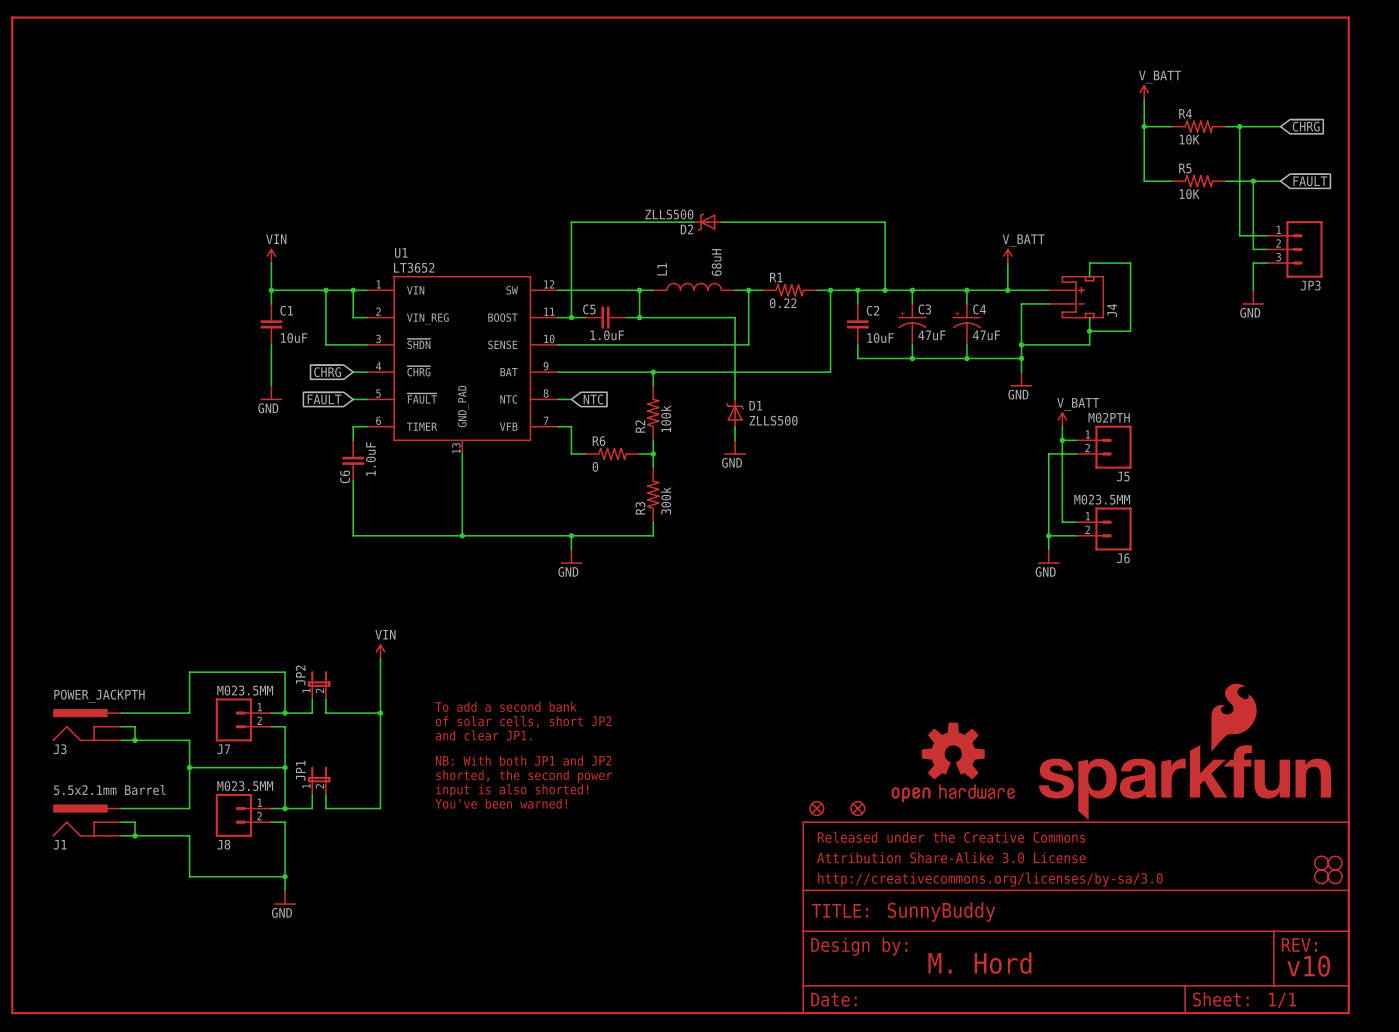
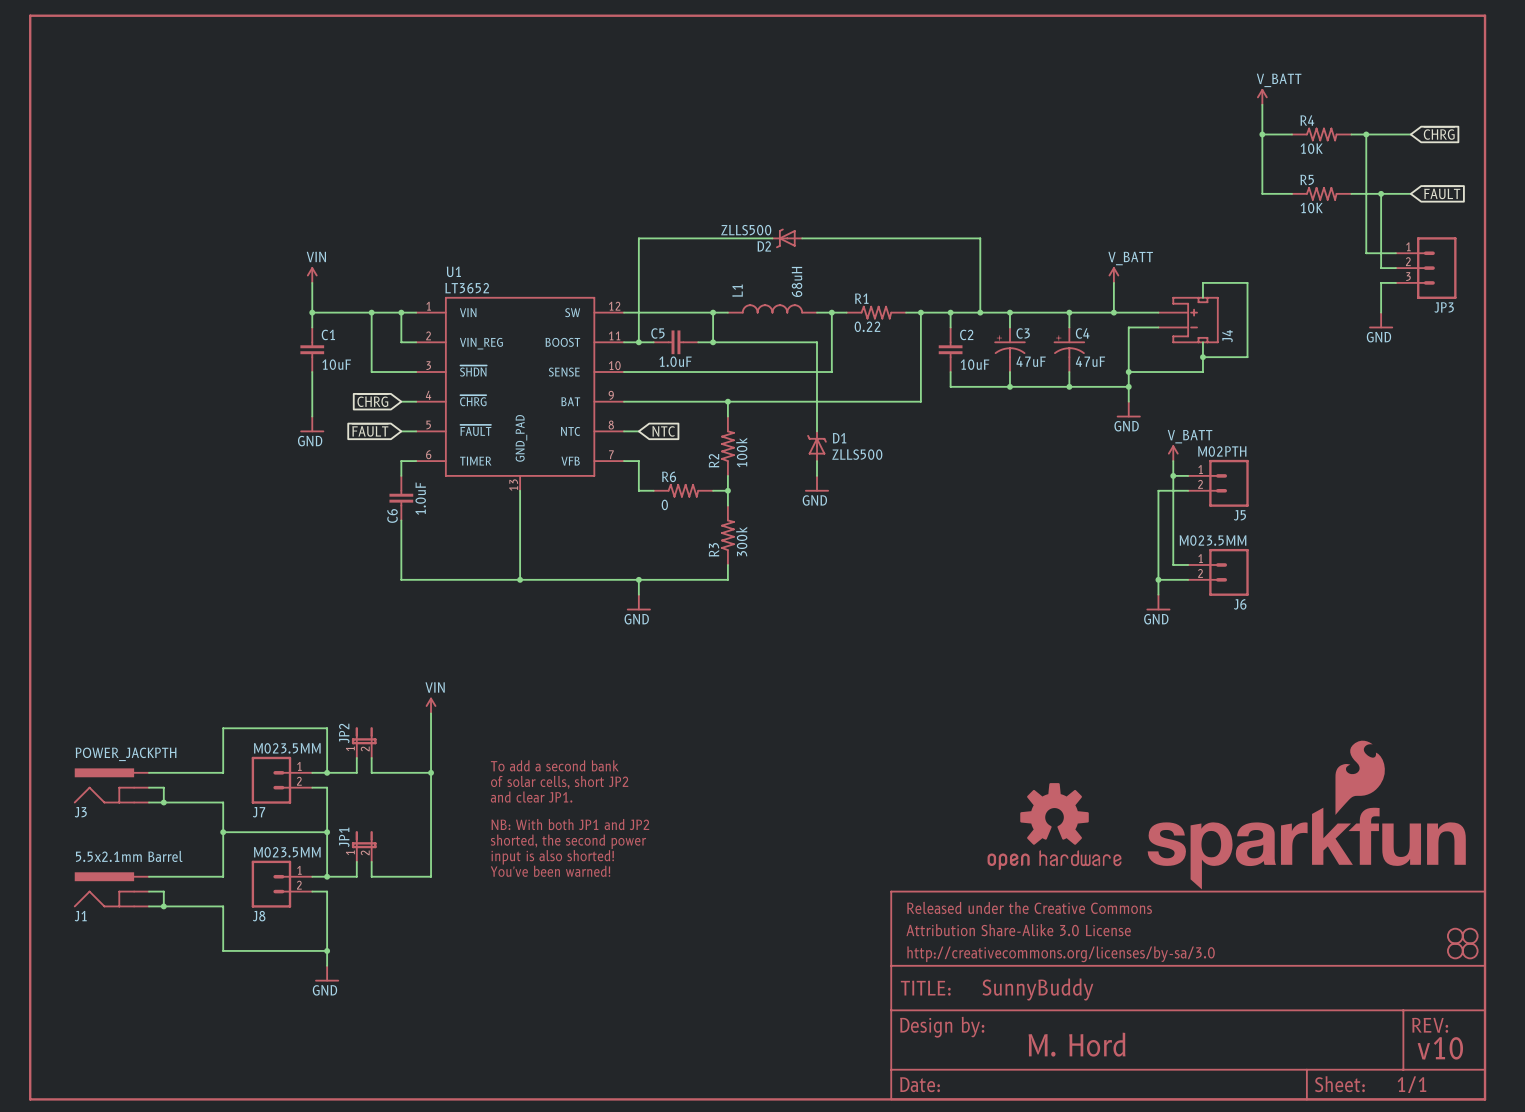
part: (816, 808) -> none
part: (857, 808) -> none

